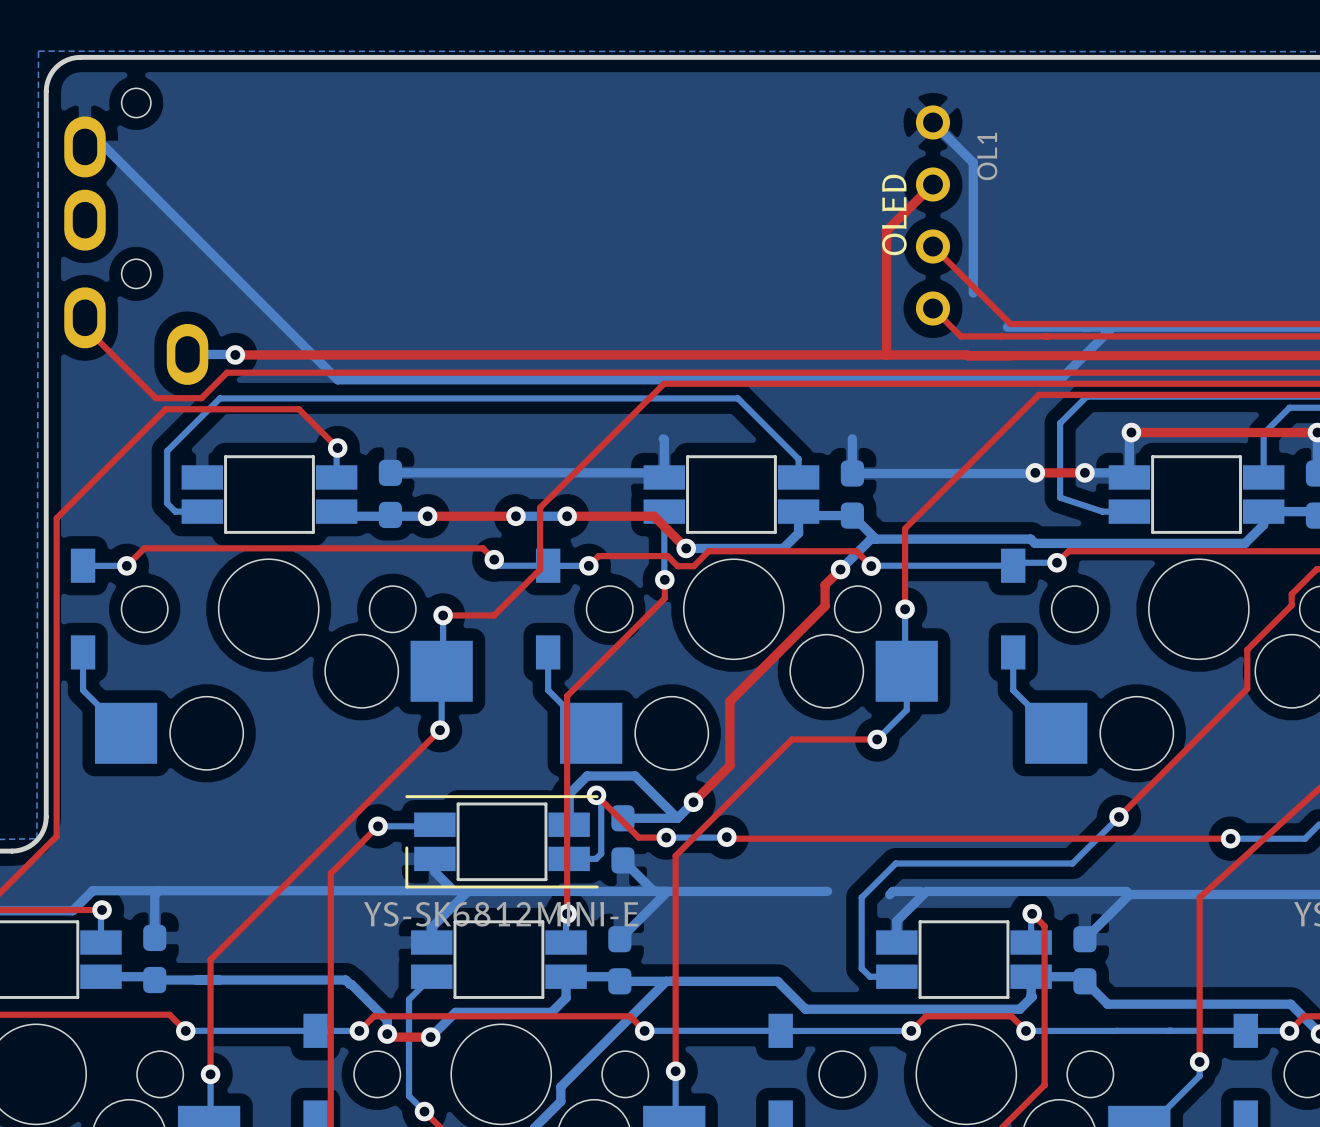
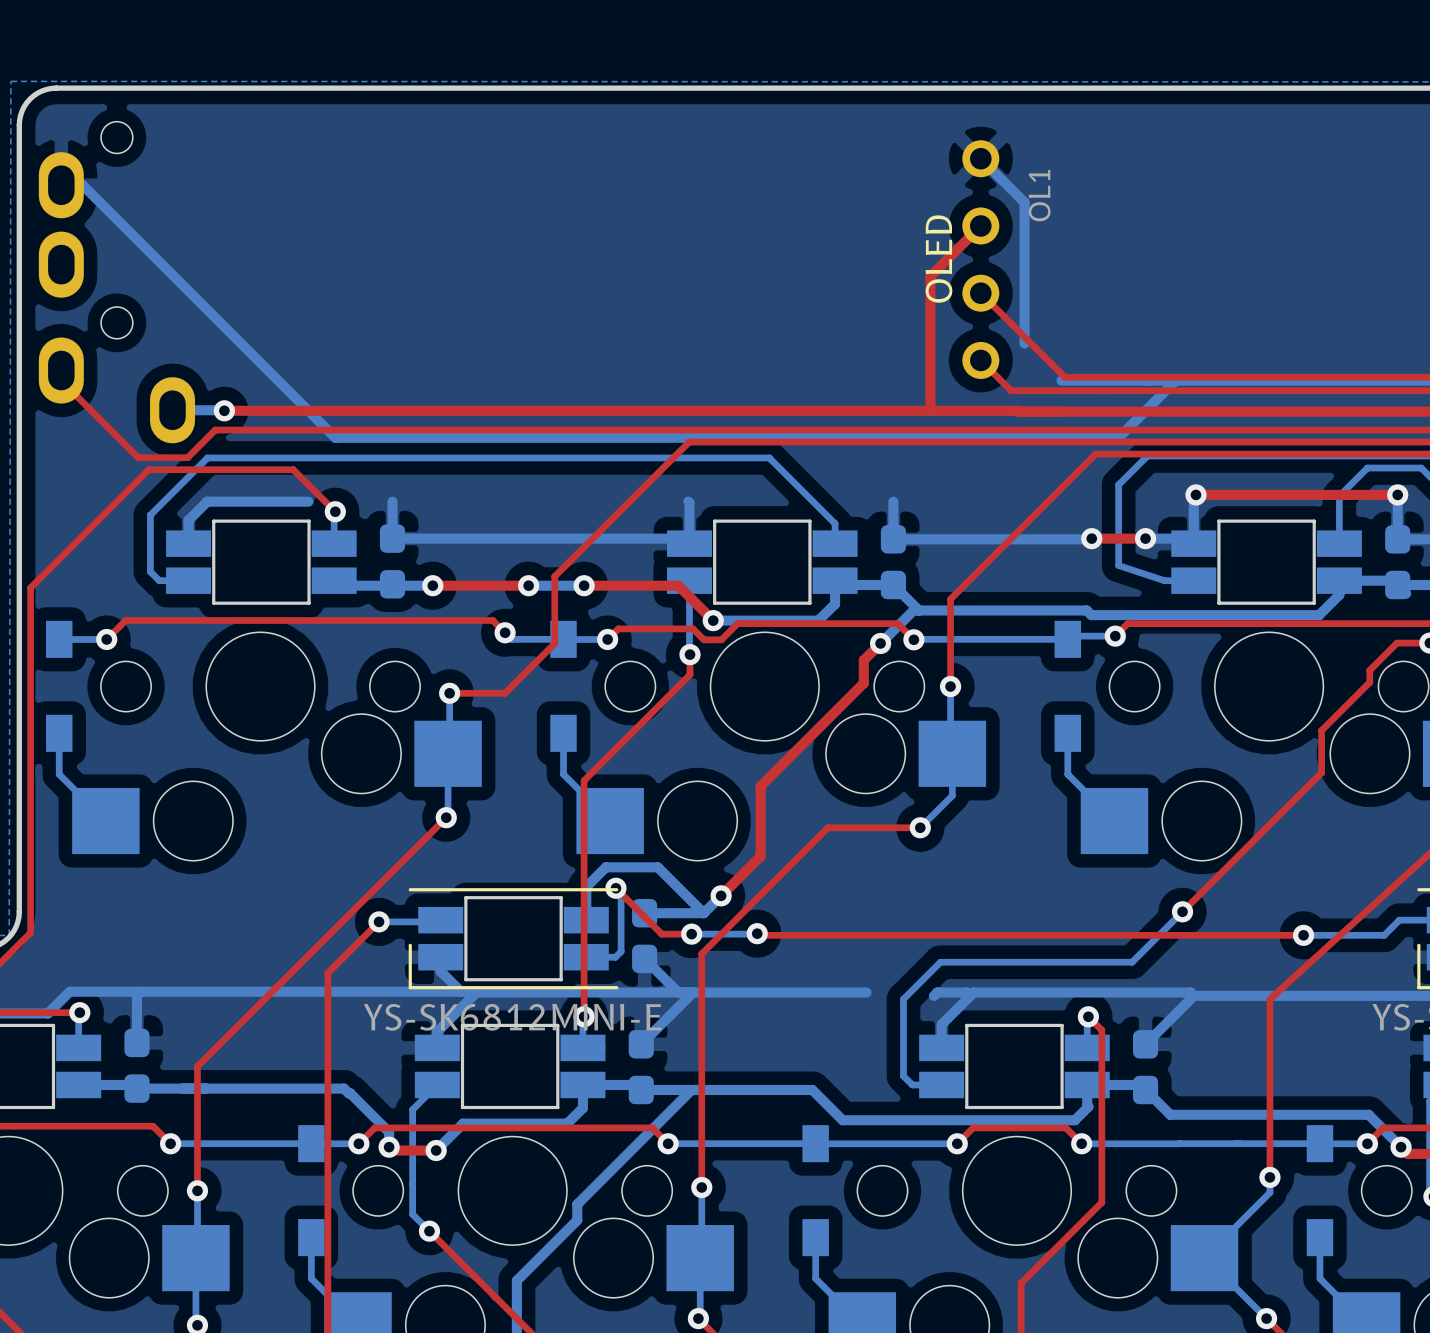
bottom track: none -> (308, 501) (207, 501) (188, 520) (188, 543)
bottom track: none -> (392, 501) (392, 538)

